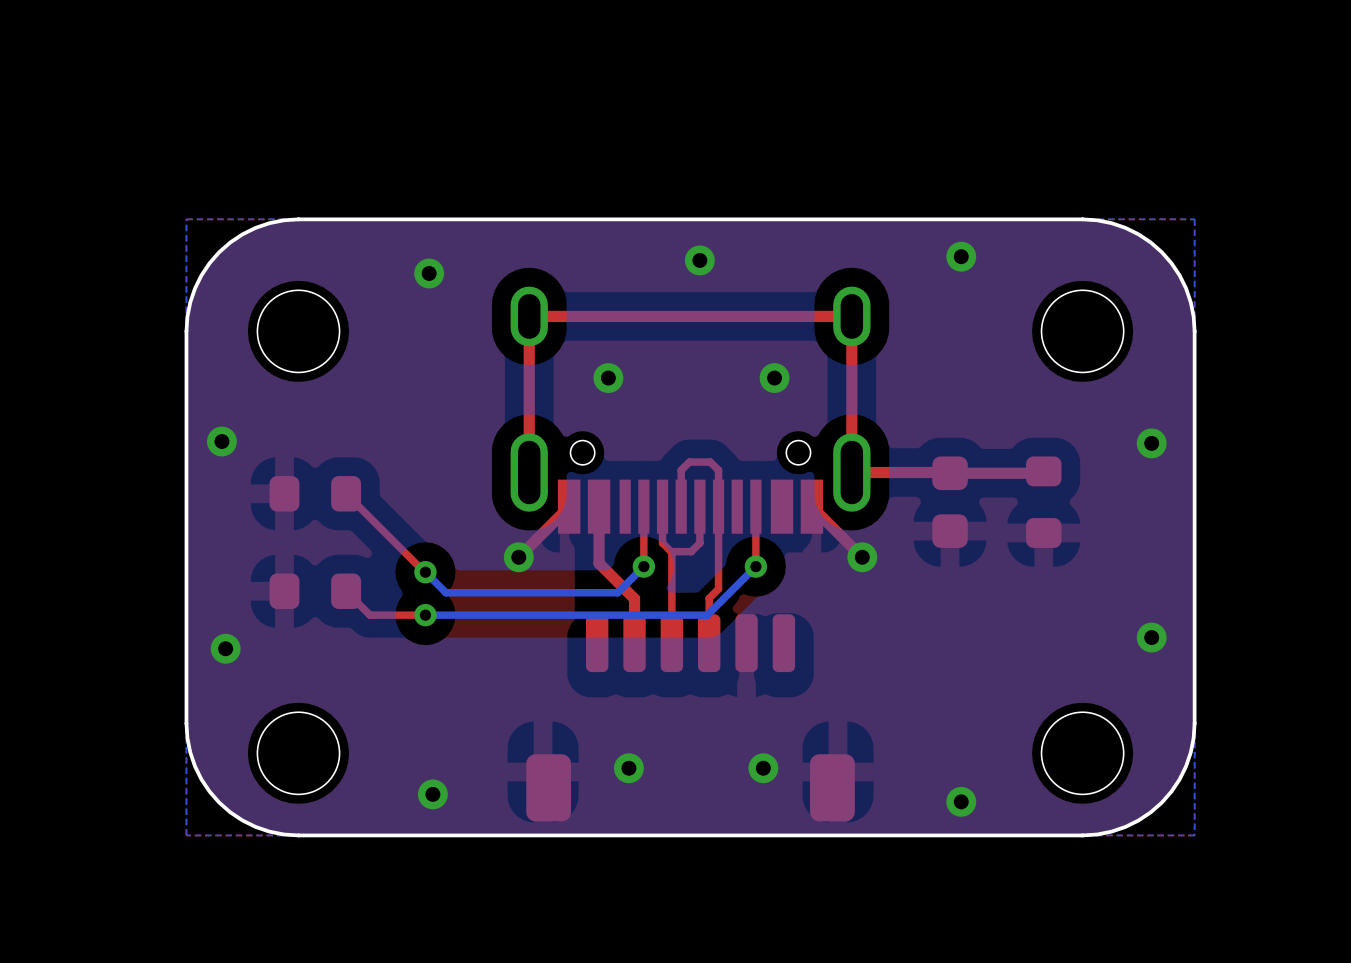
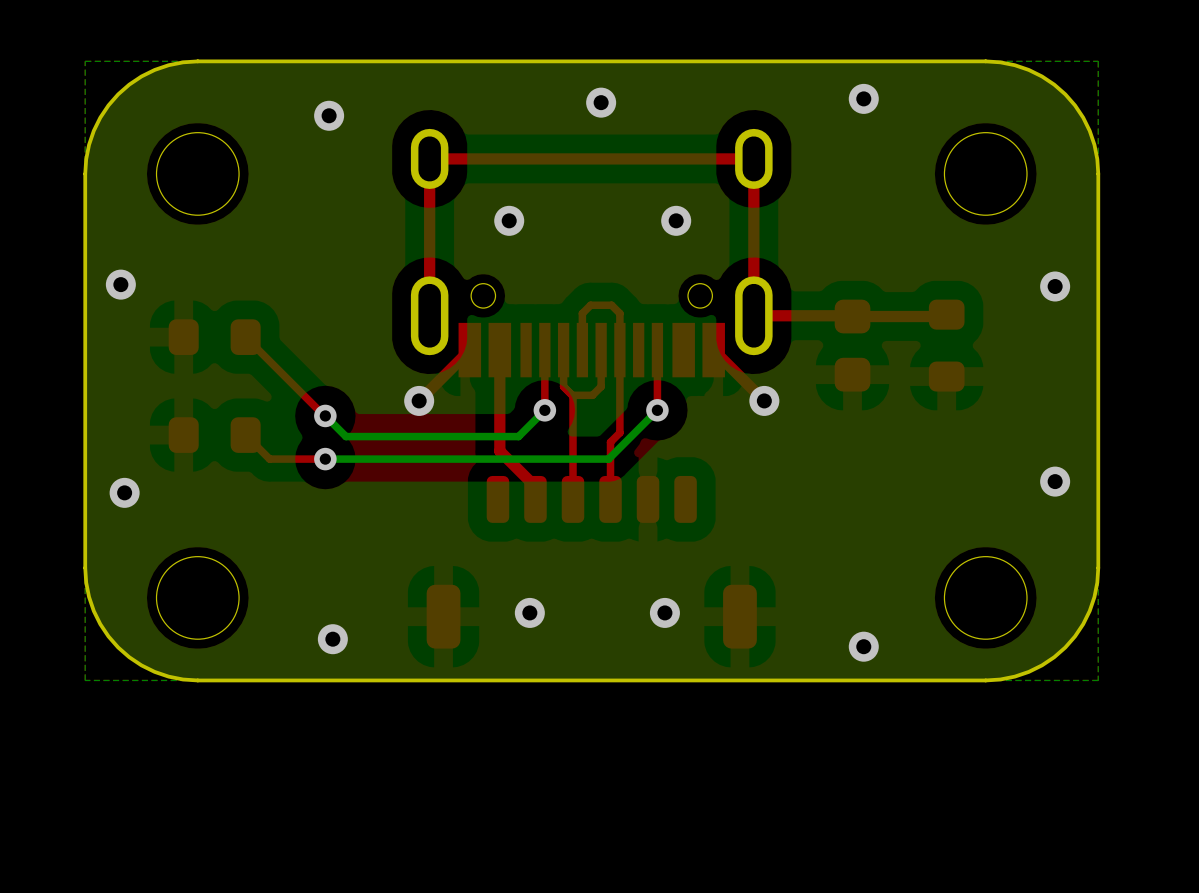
top track: (599, 563) (634, 598) (634, 642) -> (499, 407) (499, 451) (535, 486)
part footprint: [526, 614, 855, 822] -> [426, 475, 757, 649]

